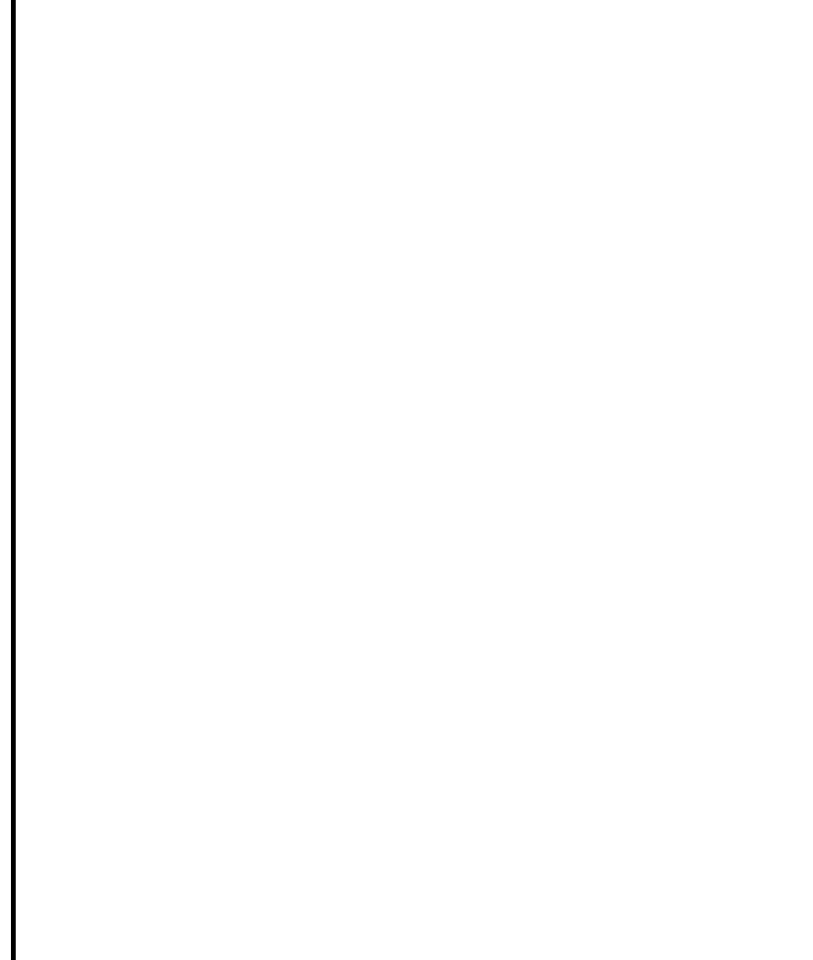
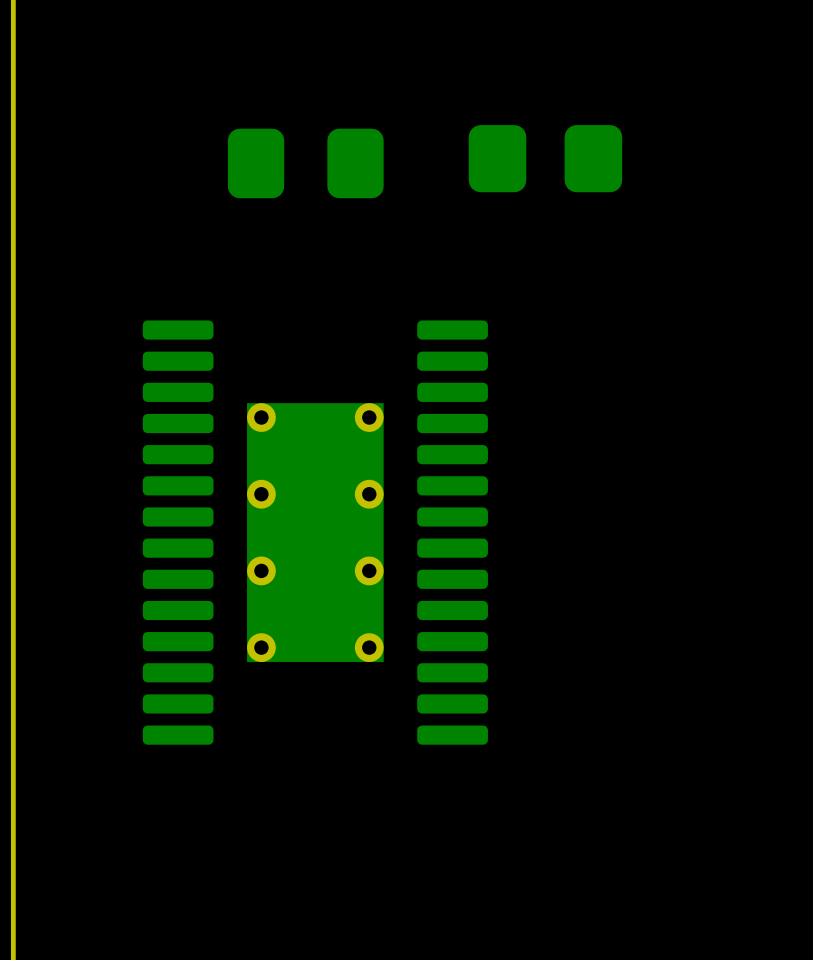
part: none -> (545, 158)
part: none -> (305, 163)
part: none -> (315, 532)

